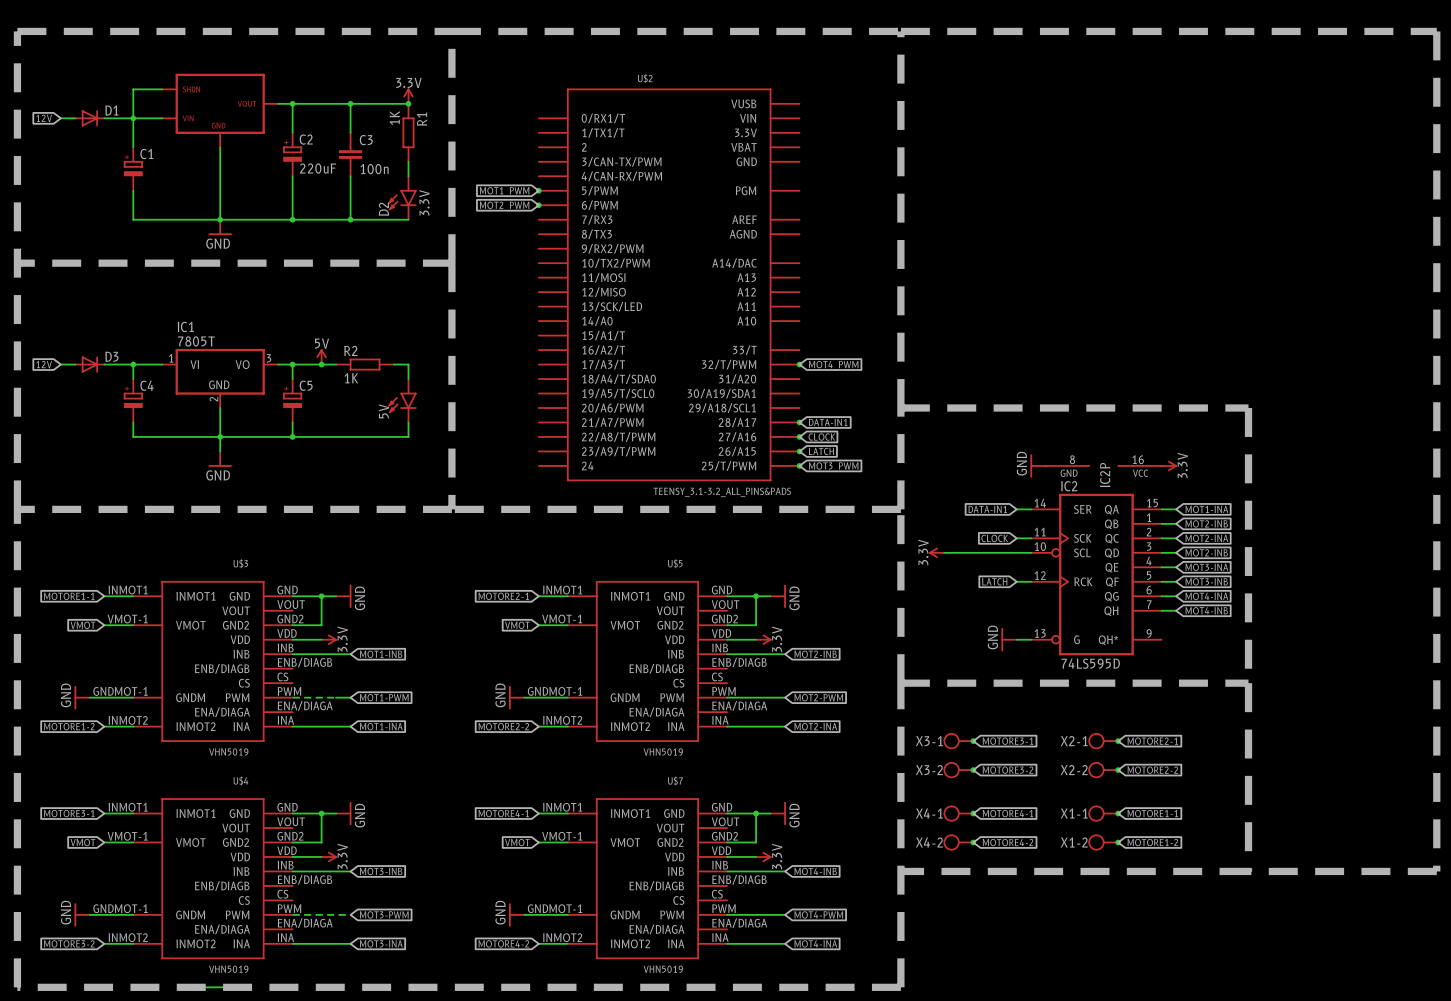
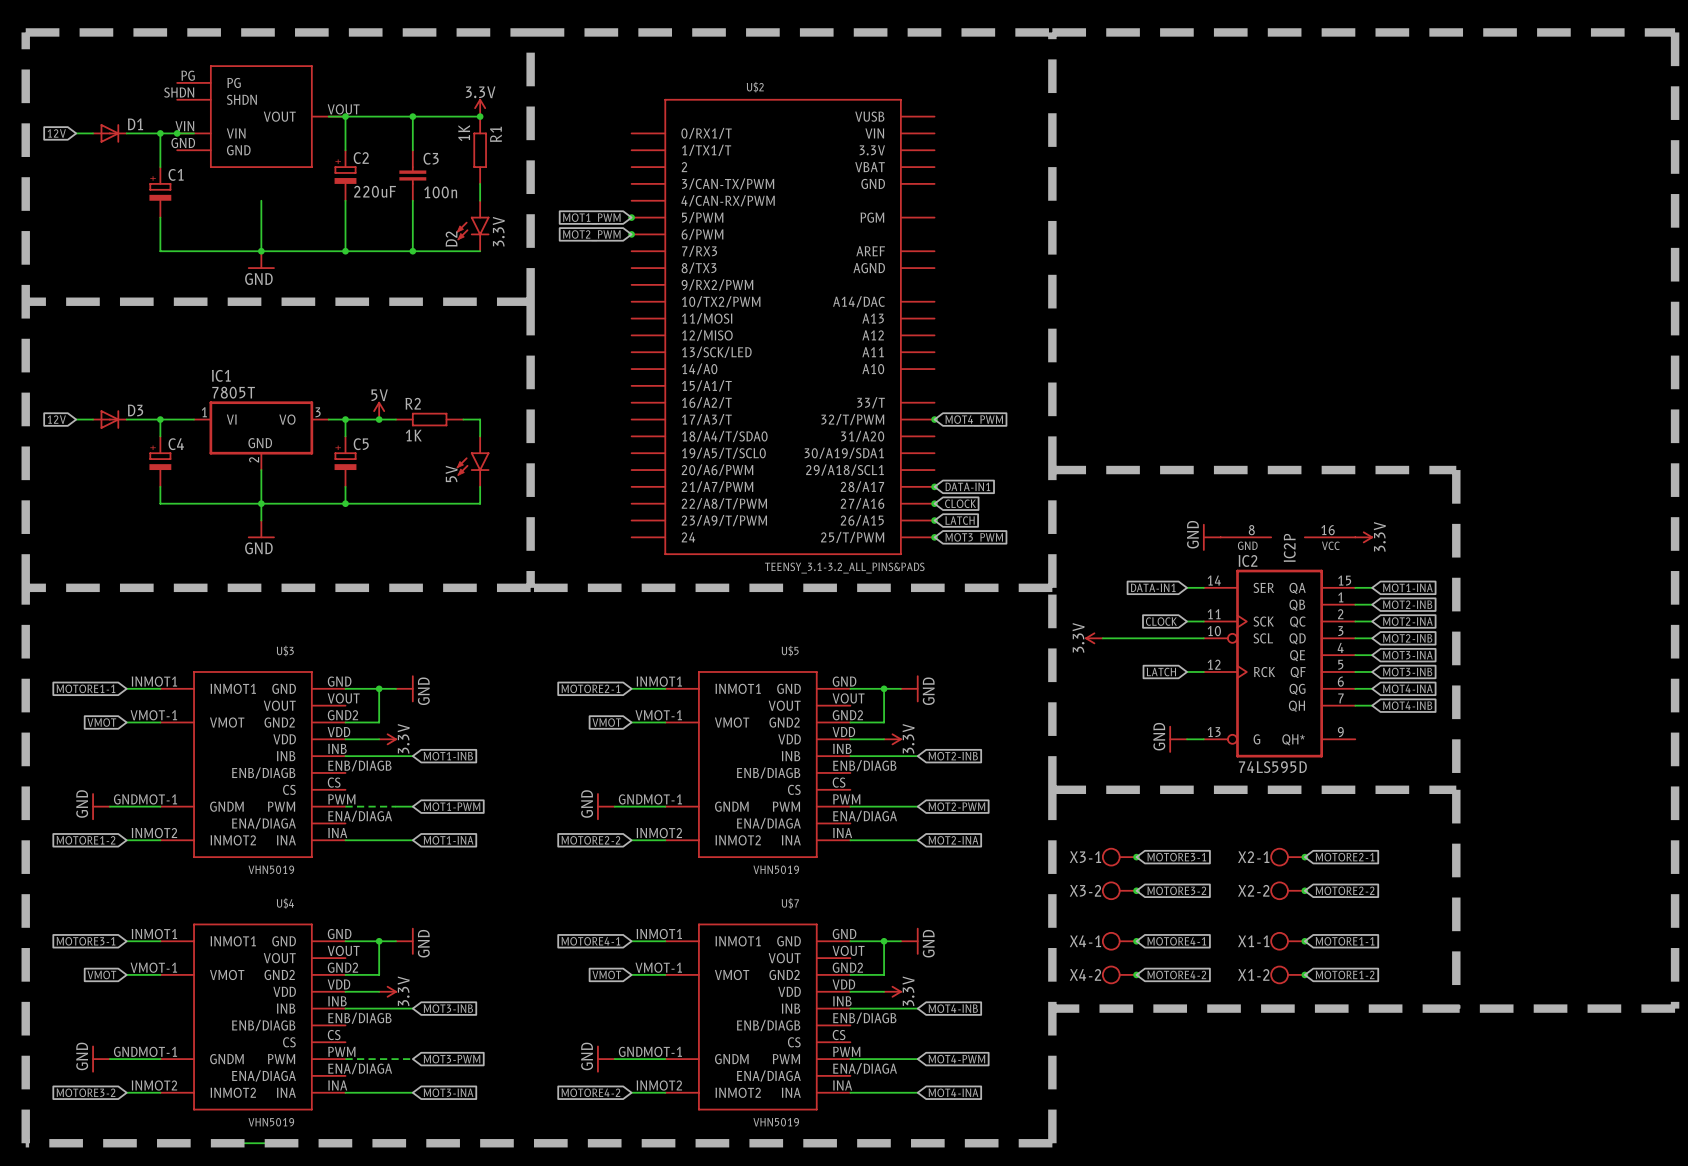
wire: (162, 89) (133, 89) (133, 118) -> none
part: none -> (261, 116)
part: (220, 110) -> none
junction: none -> (177, 133)
wire: (220, 147) (220, 176) -> none

